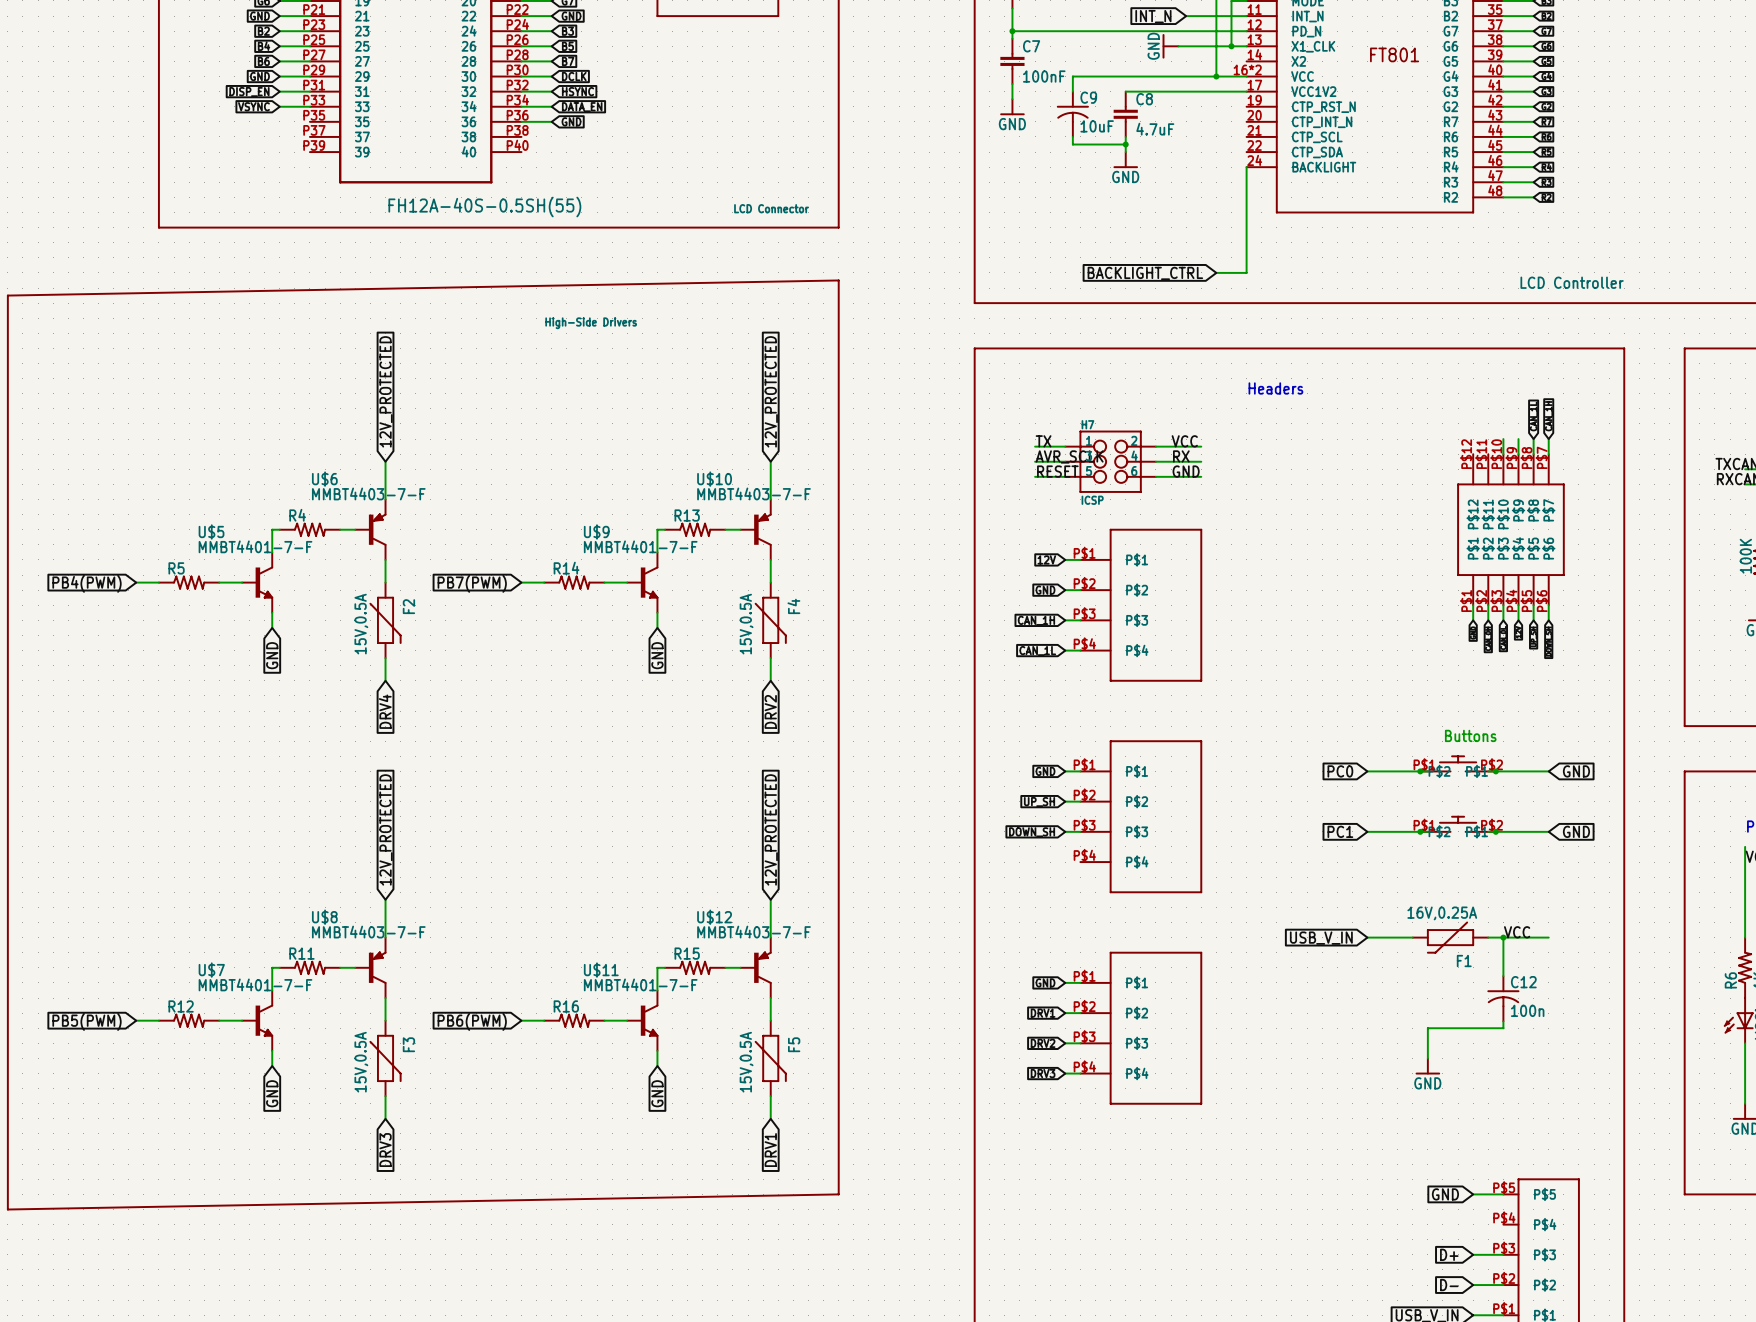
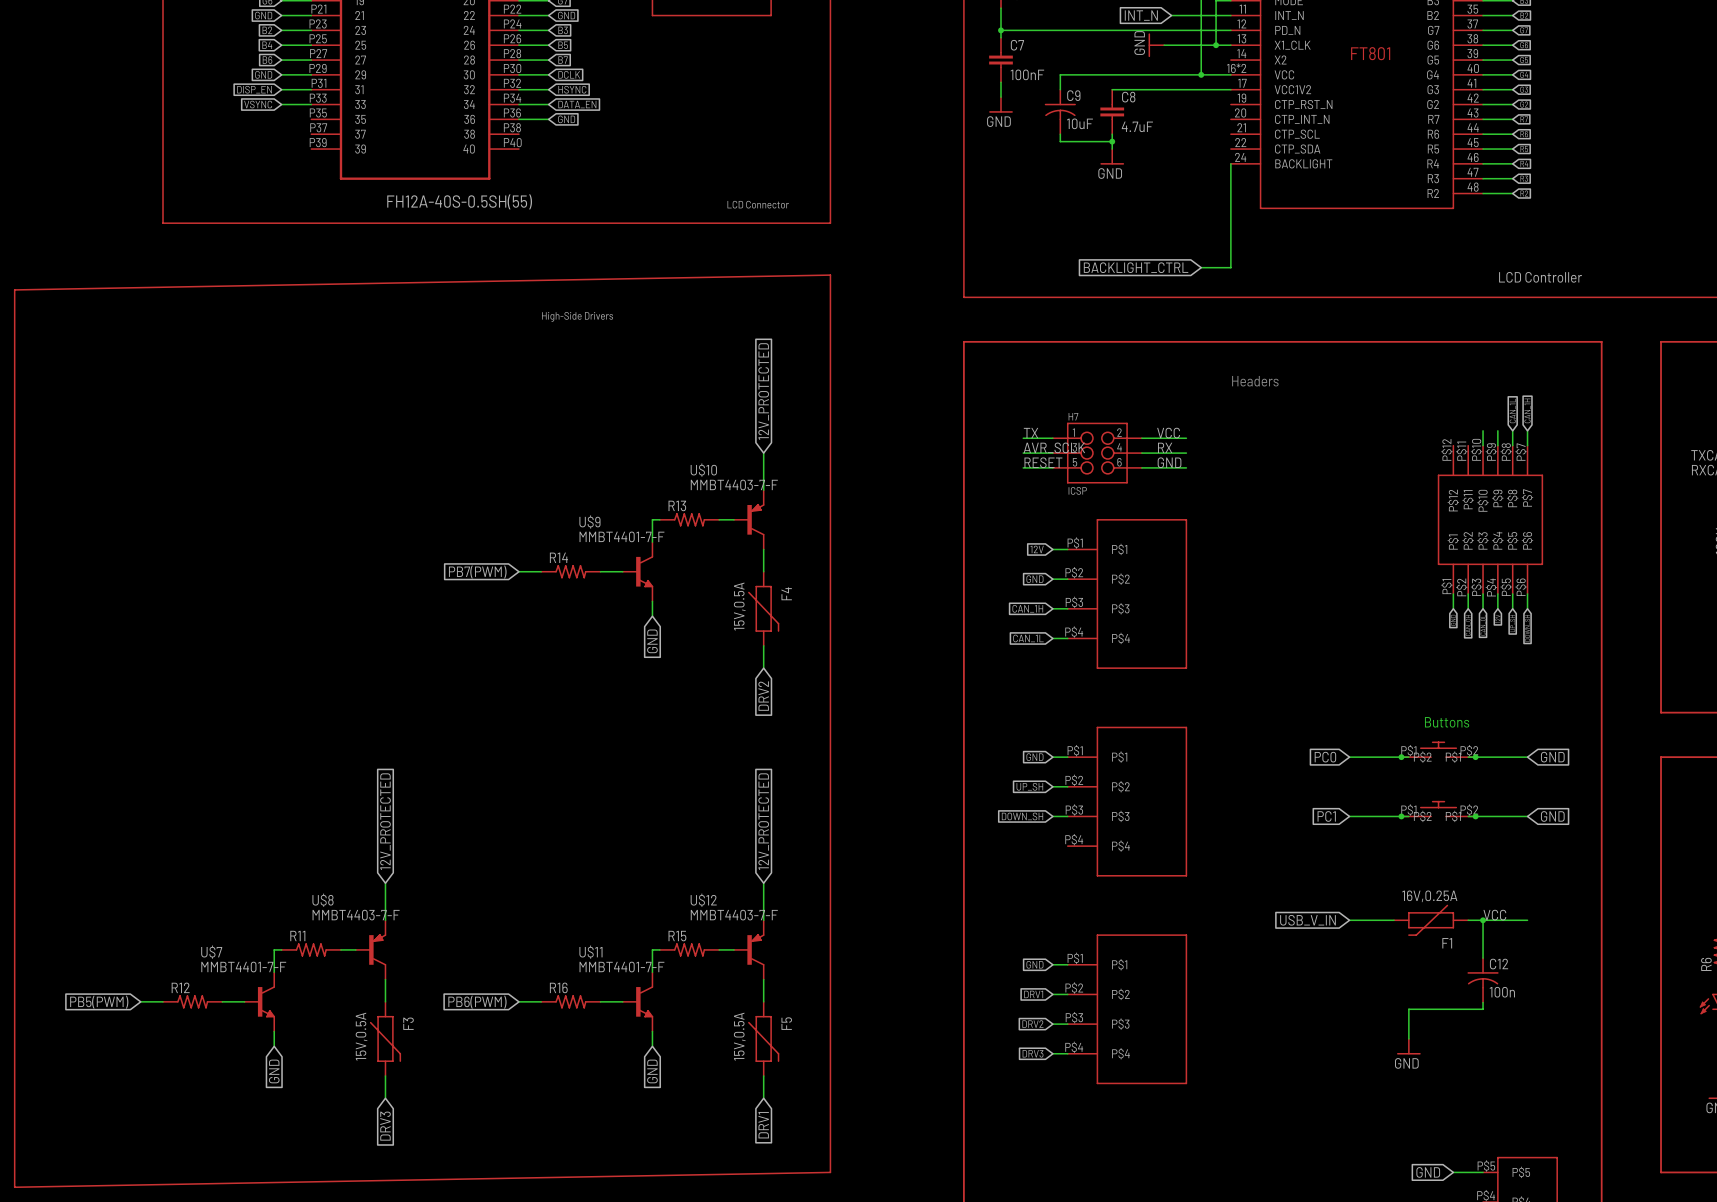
global label: 12V_PROTECTED (386, 391) -> none
wire: (385, 461) (385, 499) -> none
wire: (279, 529) (272, 529) (272, 552) -> none
R4: (309, 529) -> none
wire: (340, 529) (355, 529) -> none
U$6: MMBT4403-7-F (370, 529) -> none
wire: (385, 559) (385, 582) -> none
wire: (136, 582) (158, 582) -> none
R5: (189, 582) -> none
wire: (219, 582) (242, 582) -> none
U$5: MMBT4401-7-F (257, 582) -> none
global label: PB4(PWM) (86, 583) -> none
wire: (272, 612) (272, 627) -> none
F2: 15V,0.5A (385, 620) -> none
global label: GND (272, 655) -> none
wire: (385, 658) (385, 680) -> none
global label: DRV4 (385, 711) -> none

